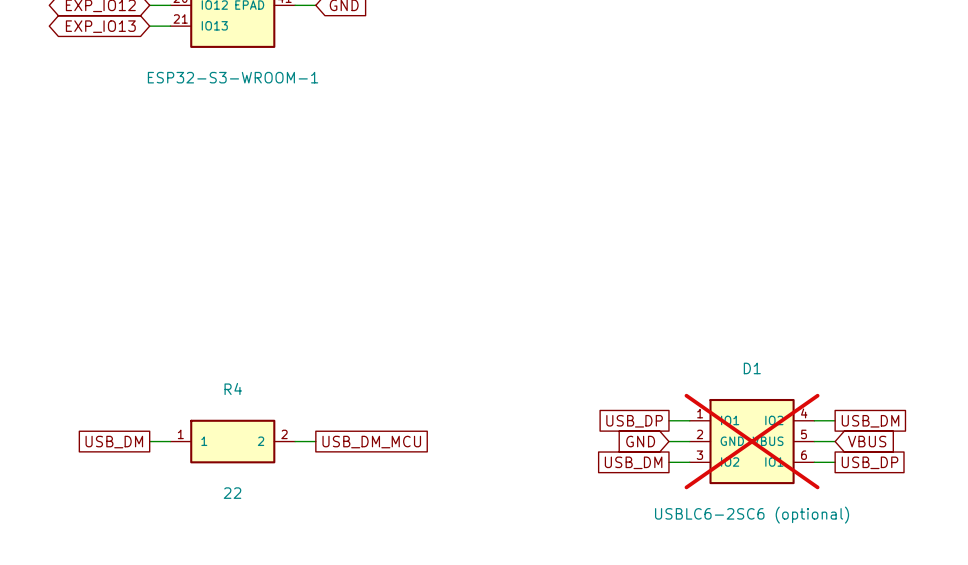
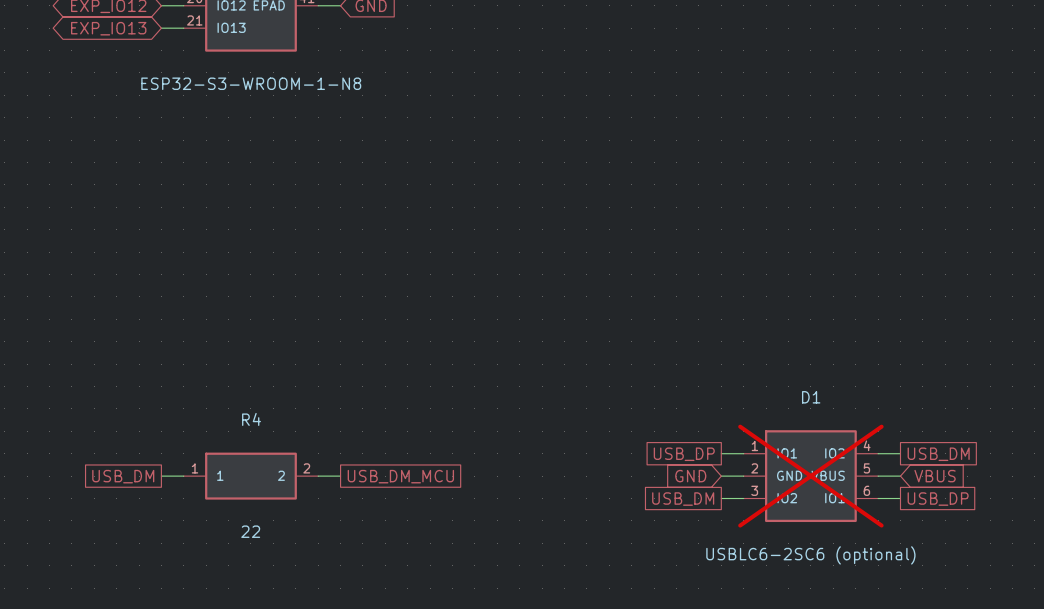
part value: ESP32-S3-WROOM-1 (233, 77) -> ESP32-S3-WROOM-1-N8 (251, 83)

